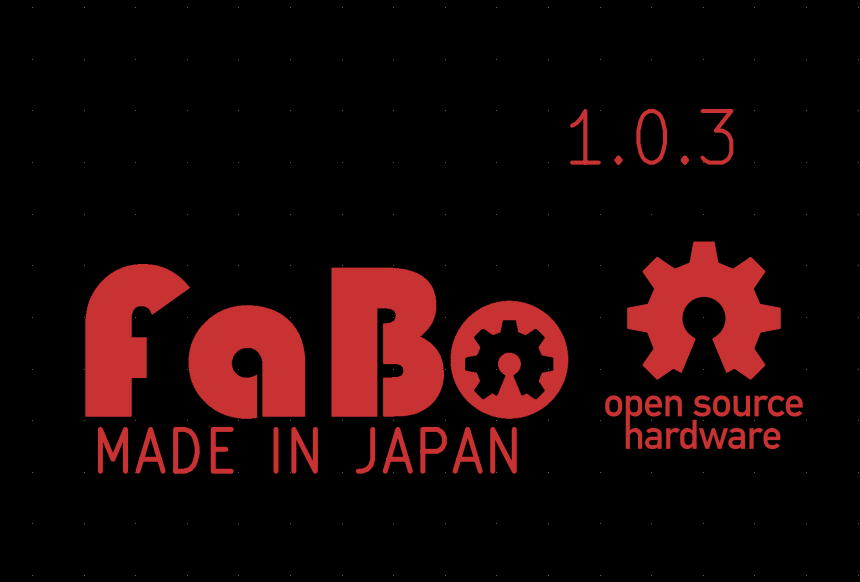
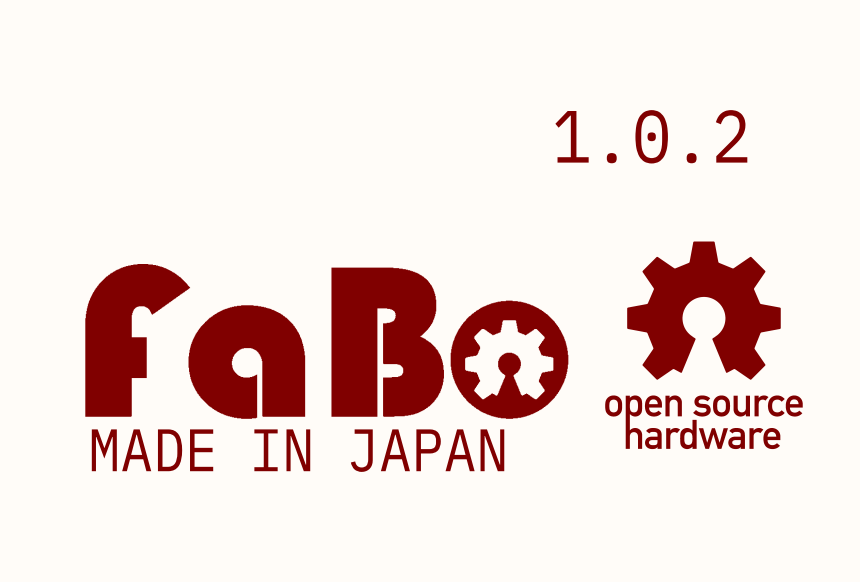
text: 1.0.3 (651, 136) -> 1.0.2 (651, 136)

